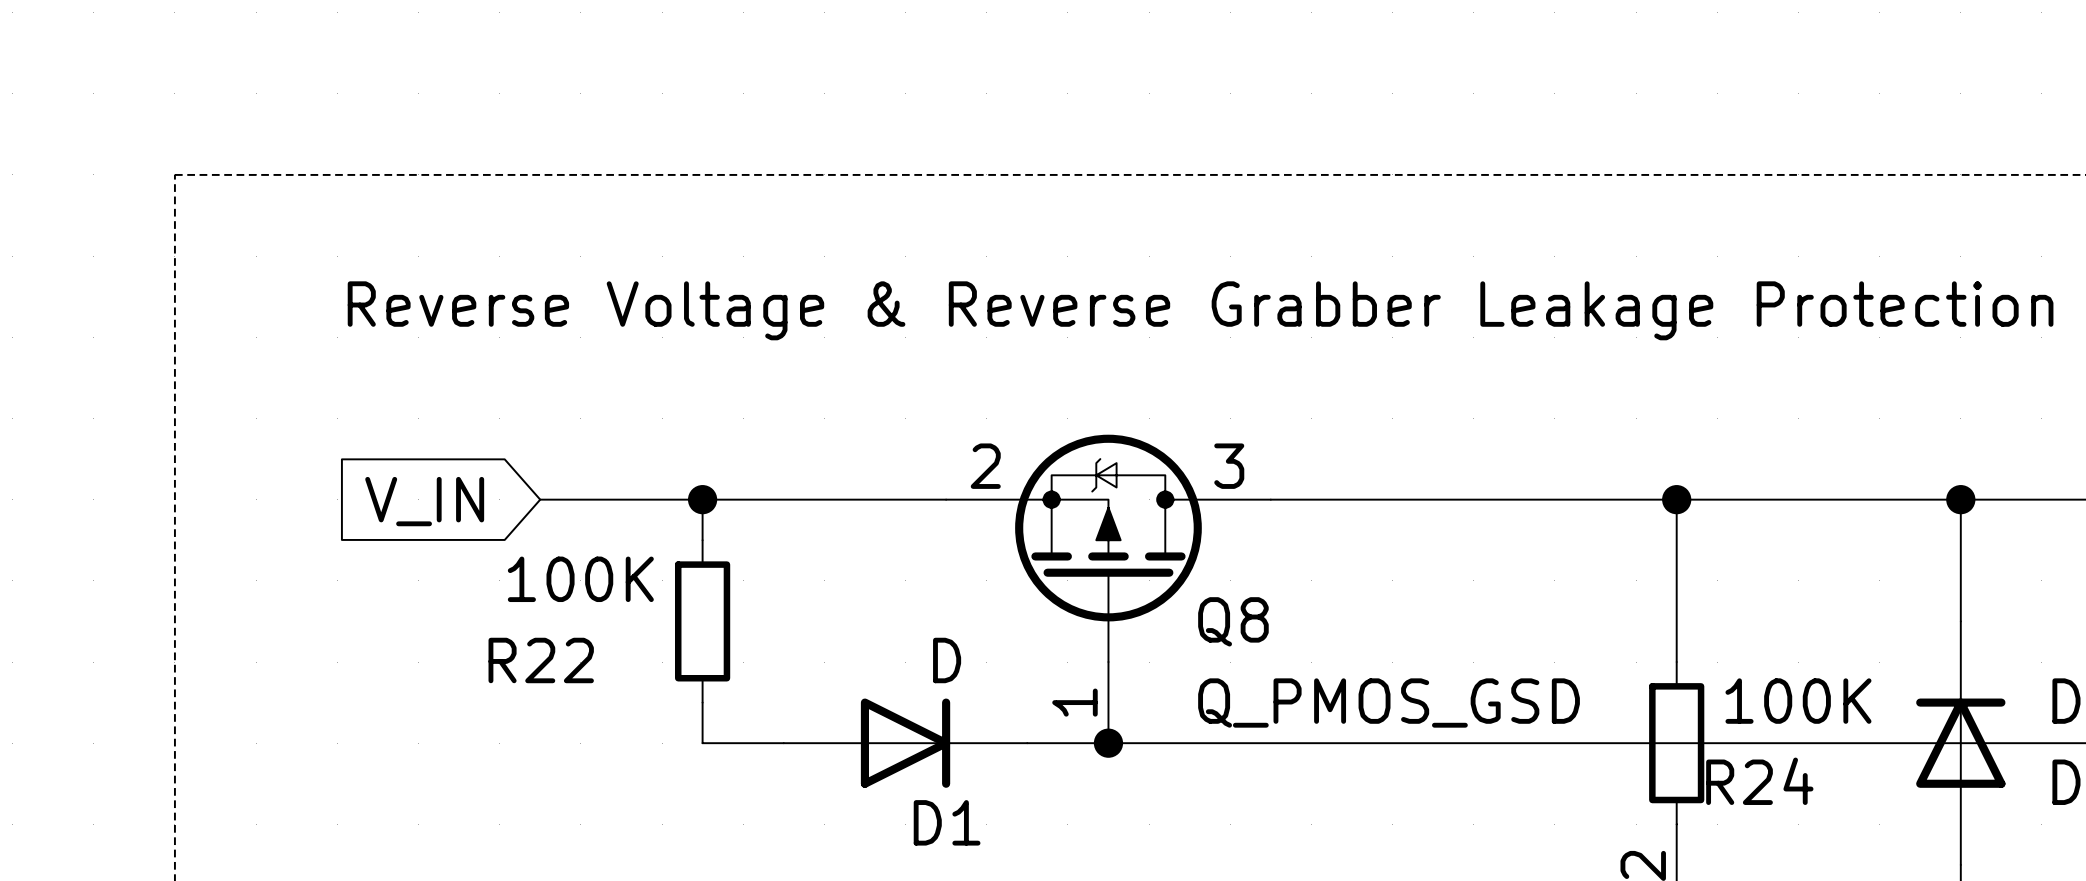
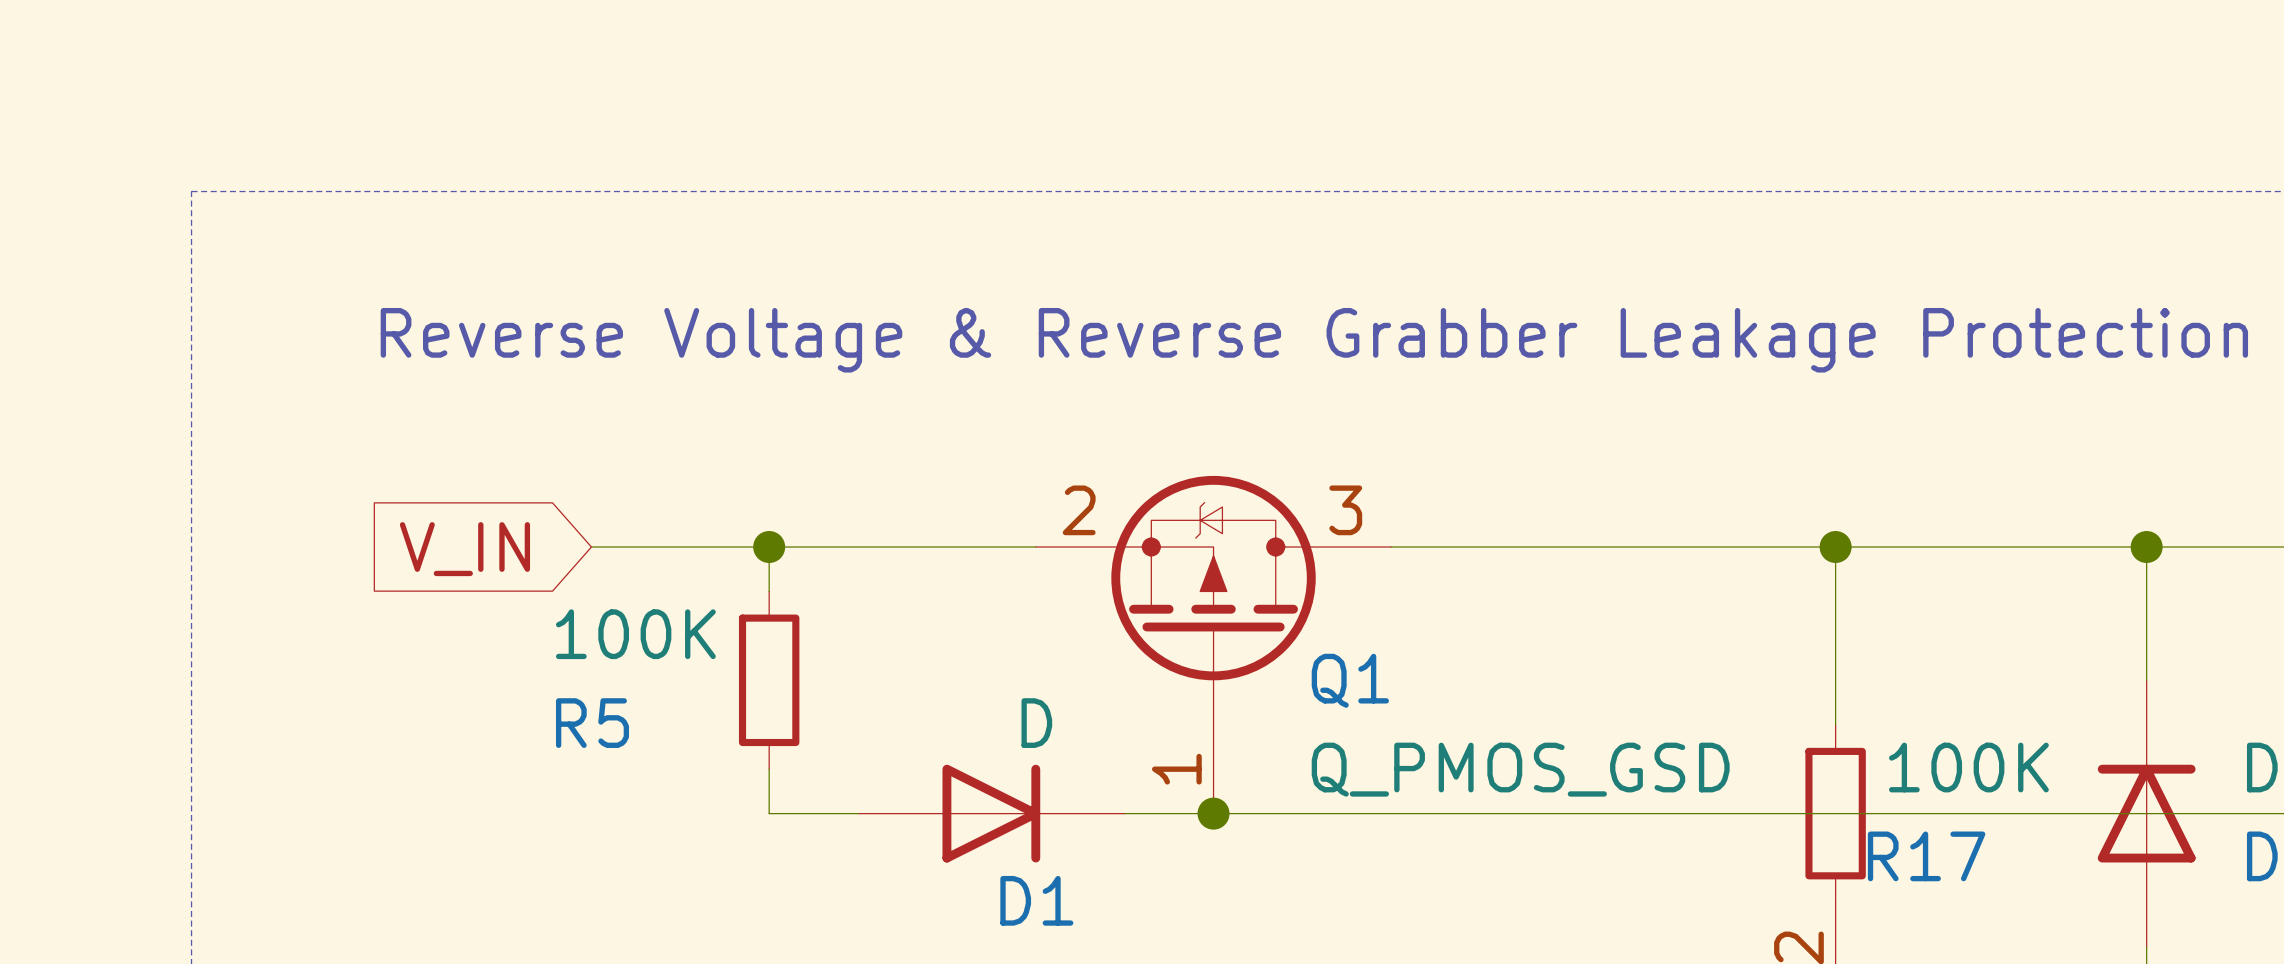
Q8 name: Q8 (1233, 621) -> Q1 (1350, 680)
R22 name: R22 (541, 660) -> R5 (592, 723)
R24 name: R24 (1759, 781) -> R17 (1926, 856)

